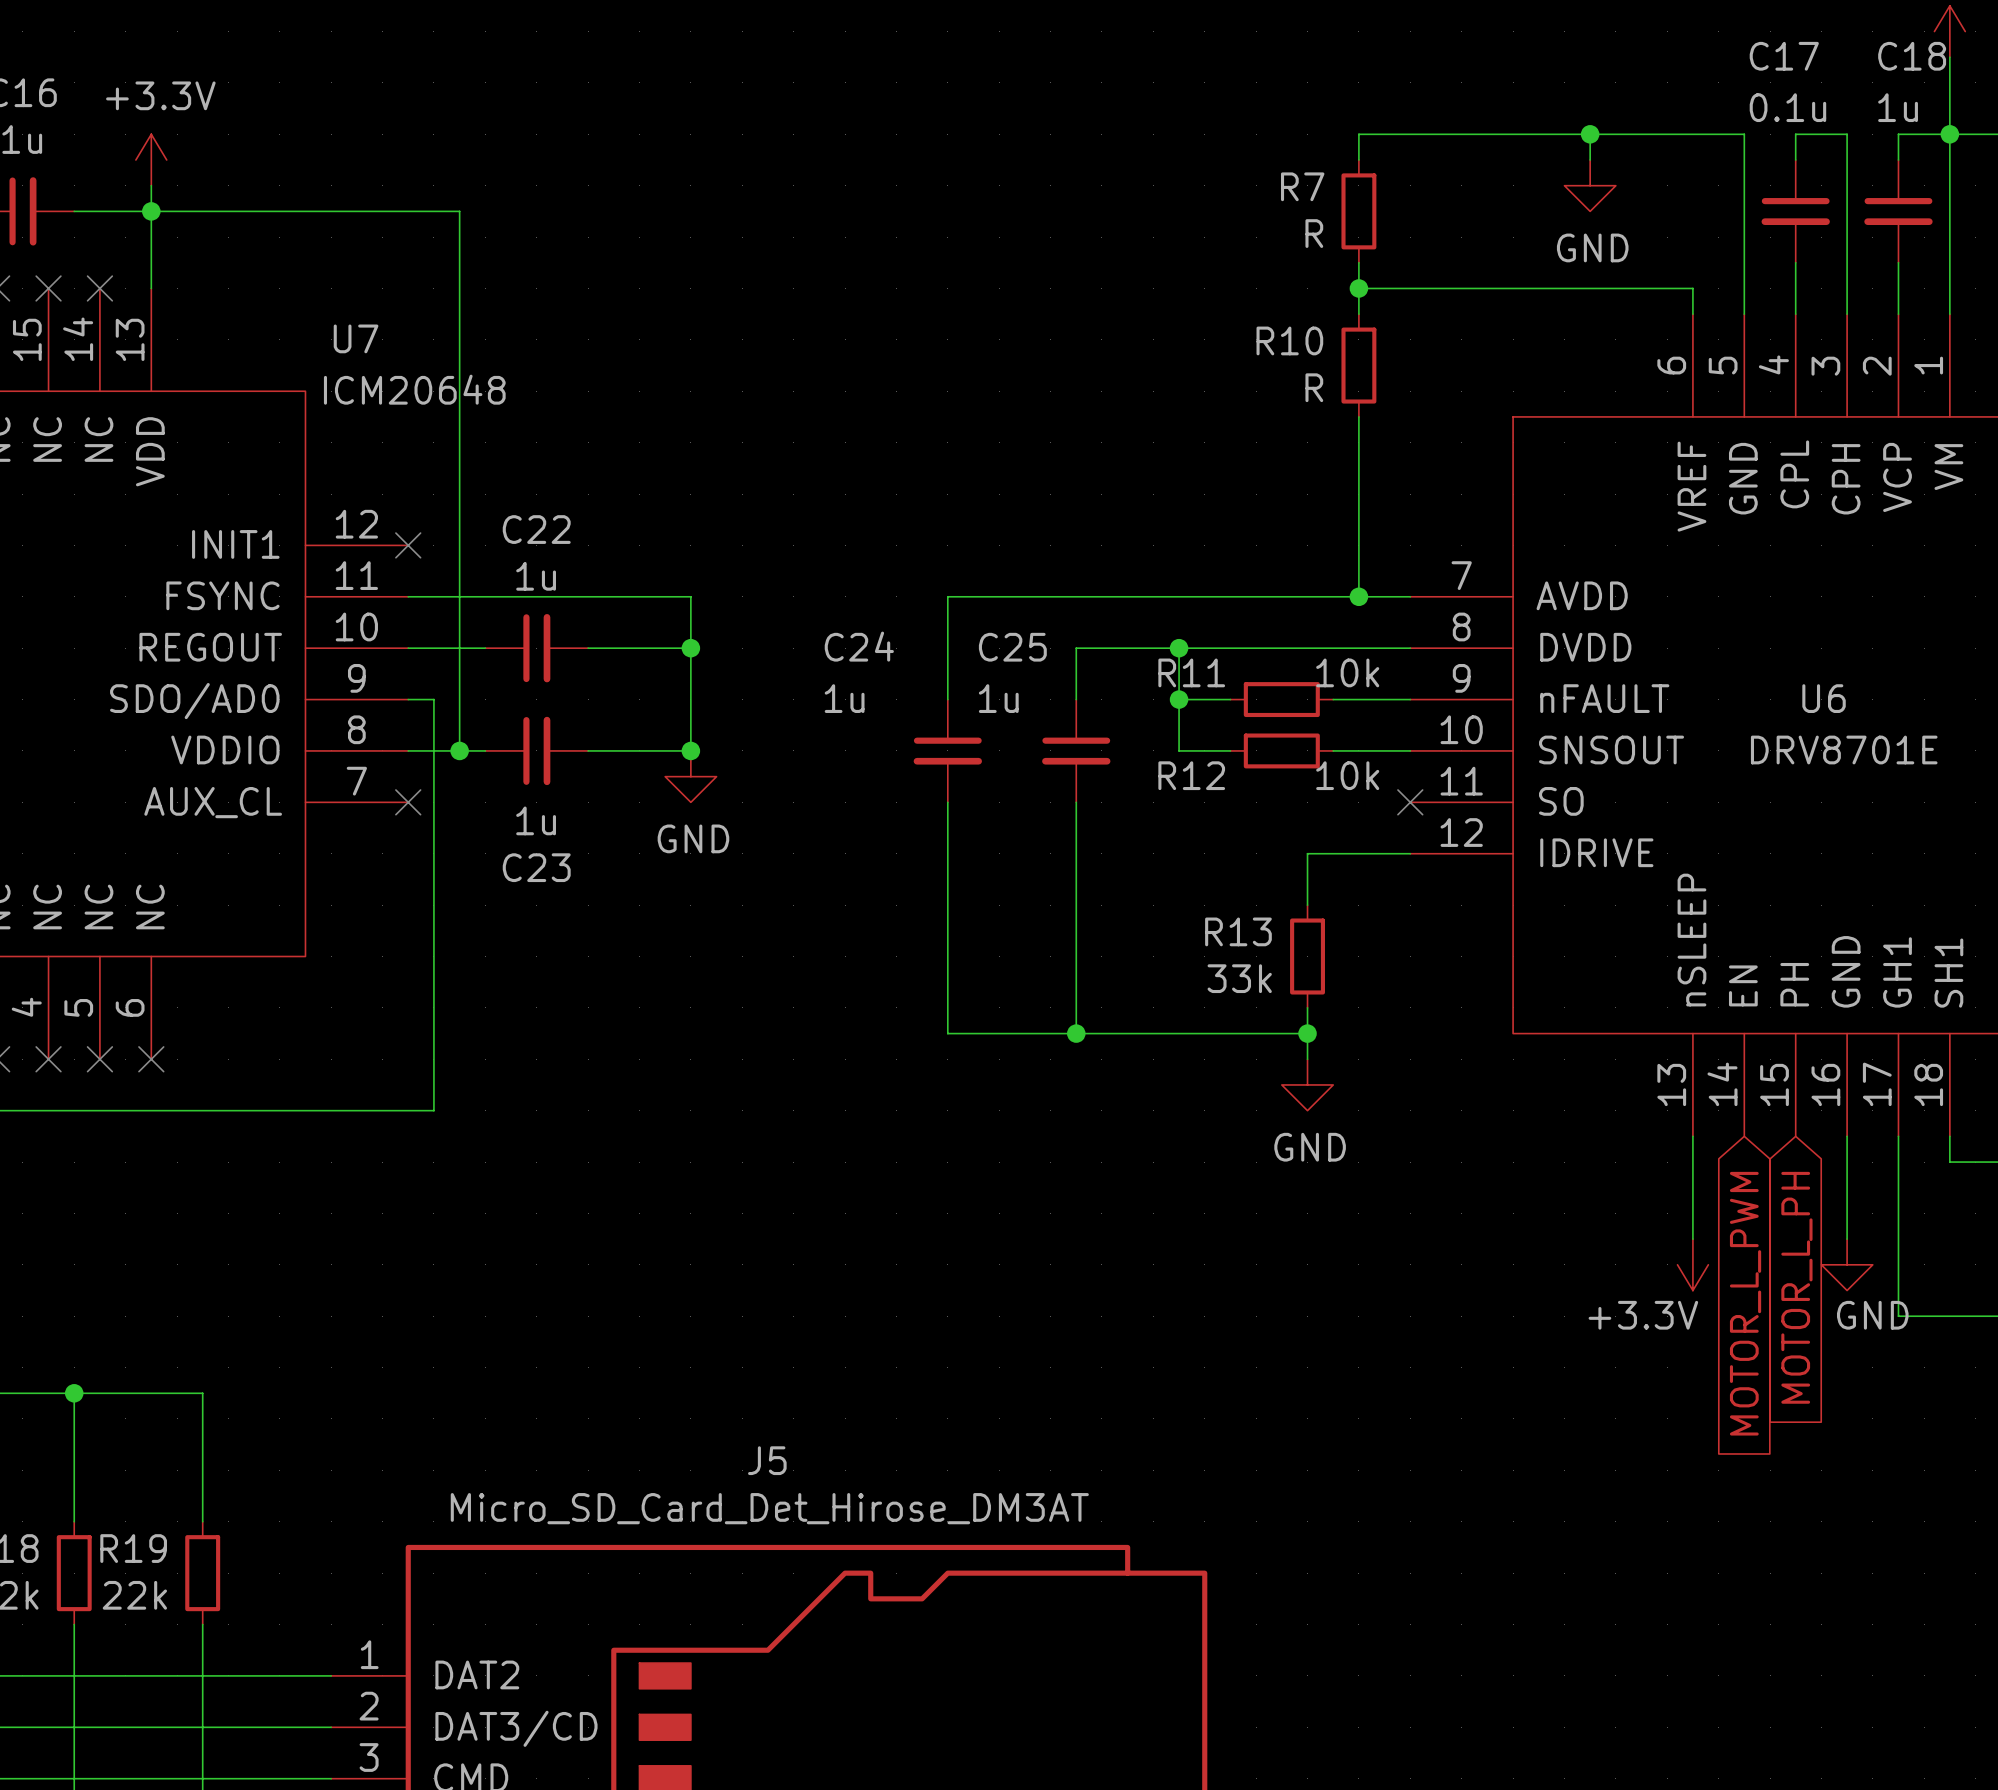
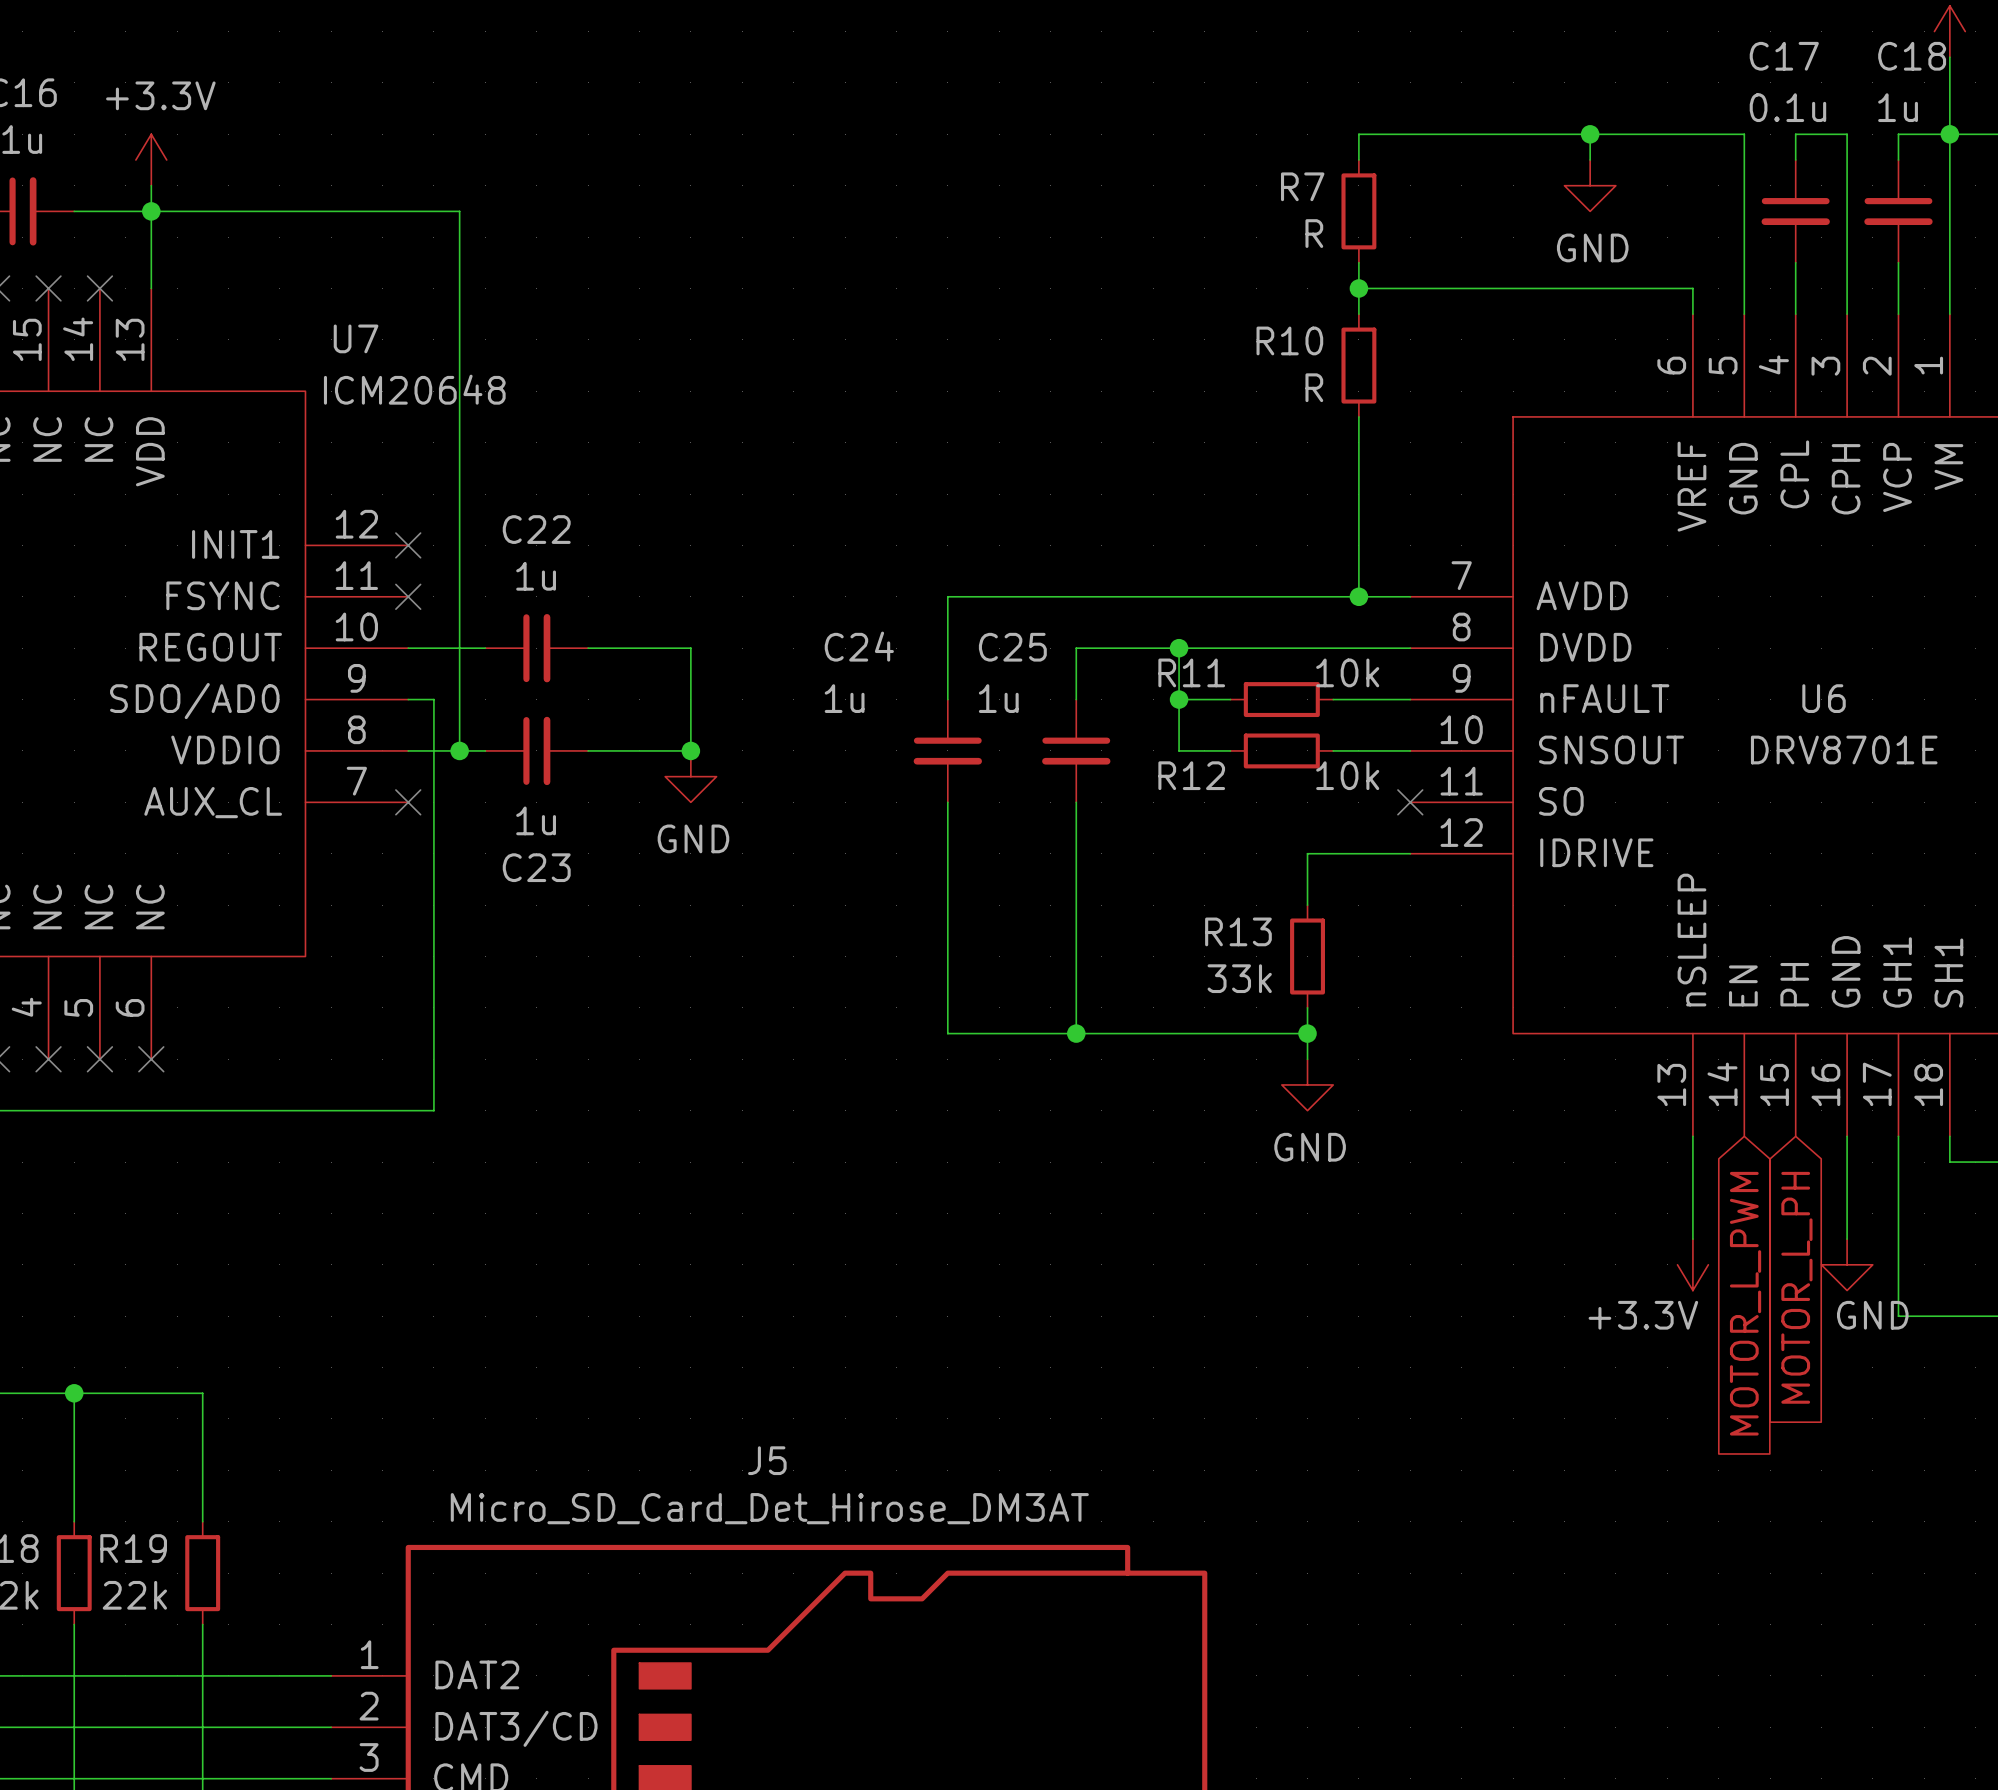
wire: (408, 596) (690, 596) (690, 648) -> none
no-connect mark: none -> (408, 596)
junction: (690, 648) -> none

